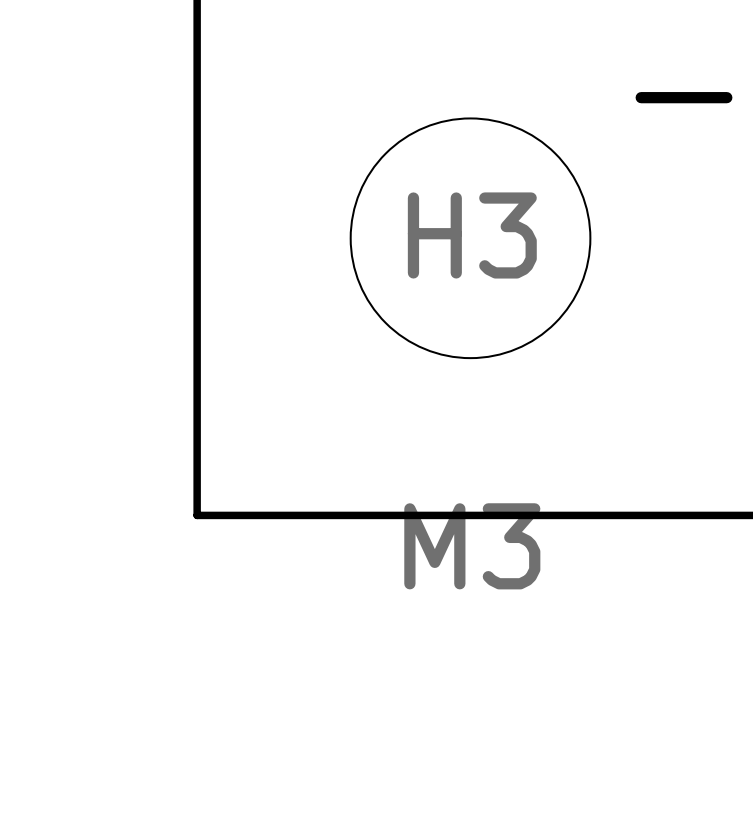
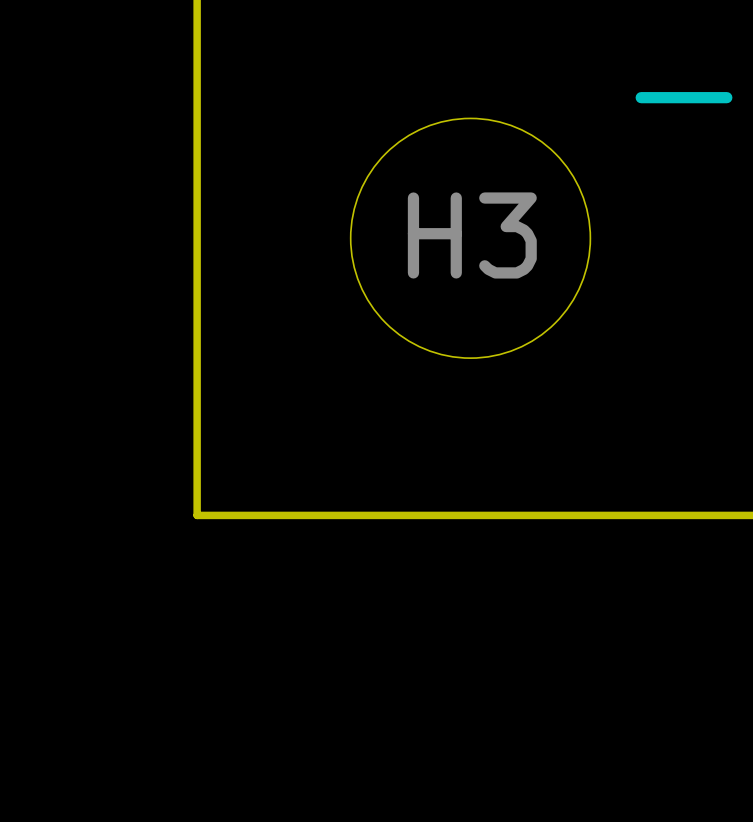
H3 value: M3 (472, 546) -> none

